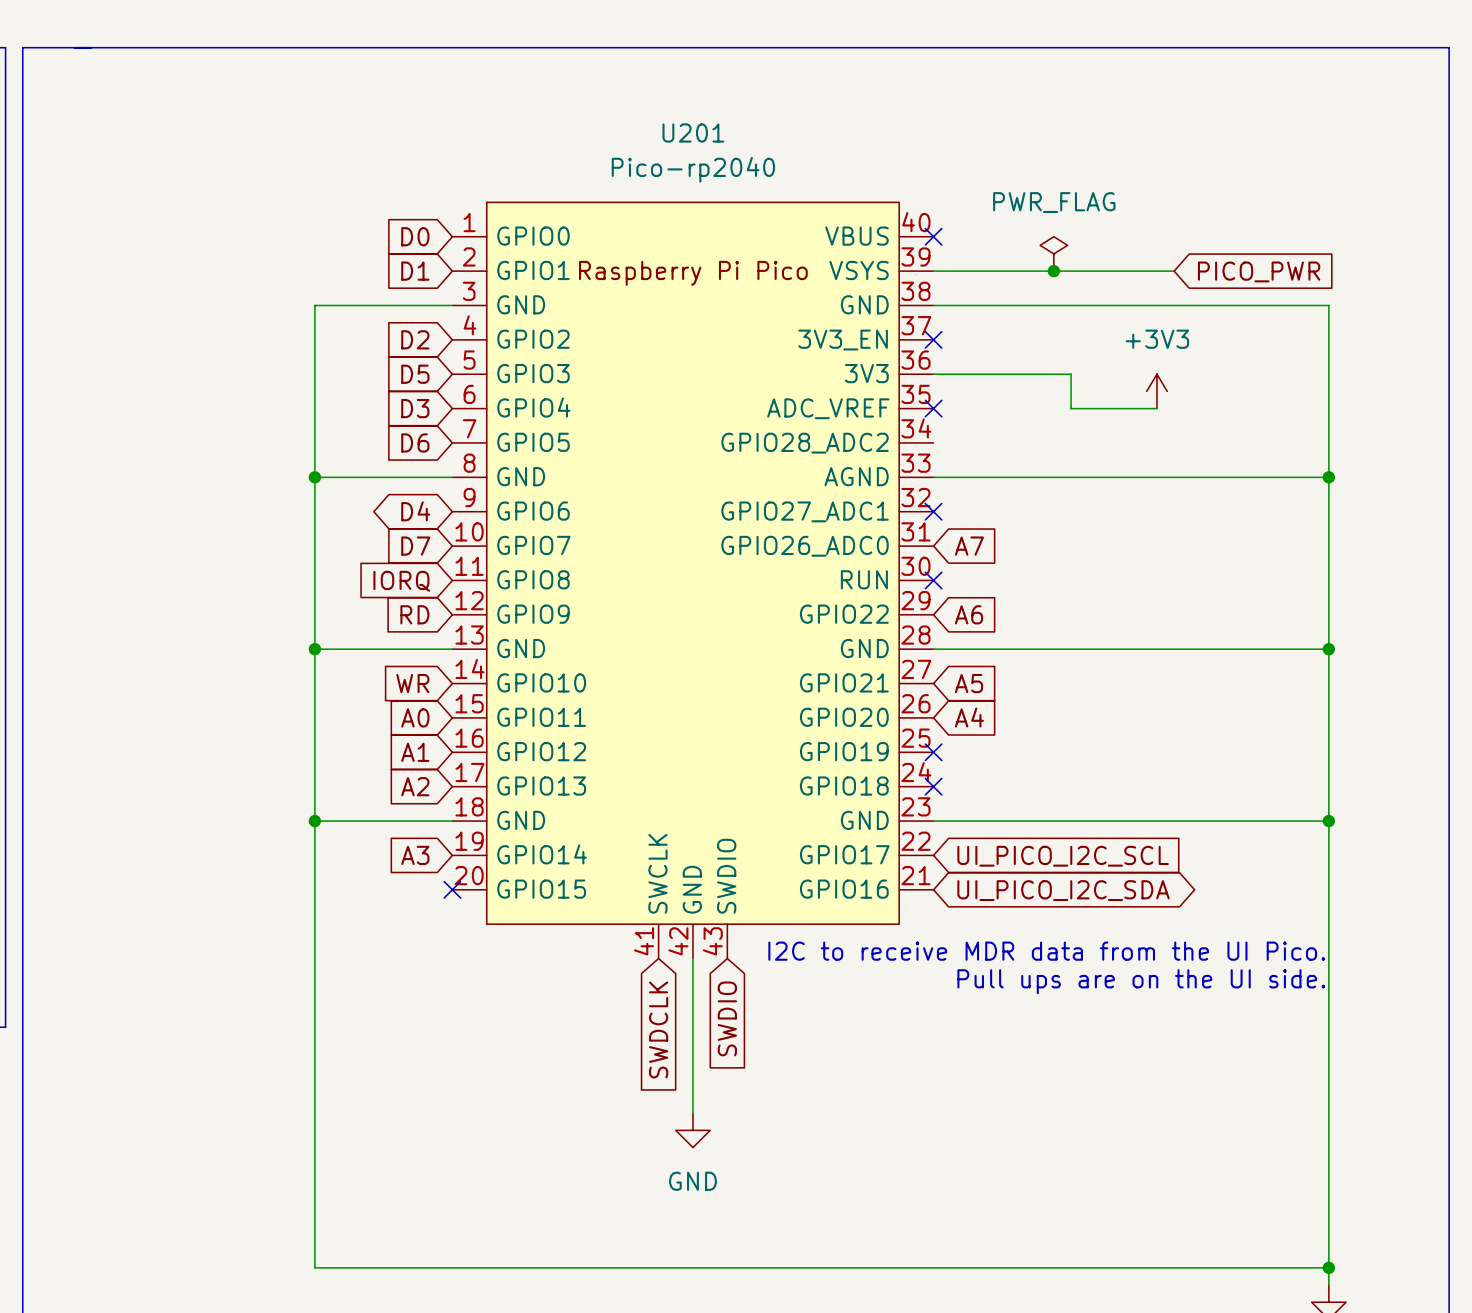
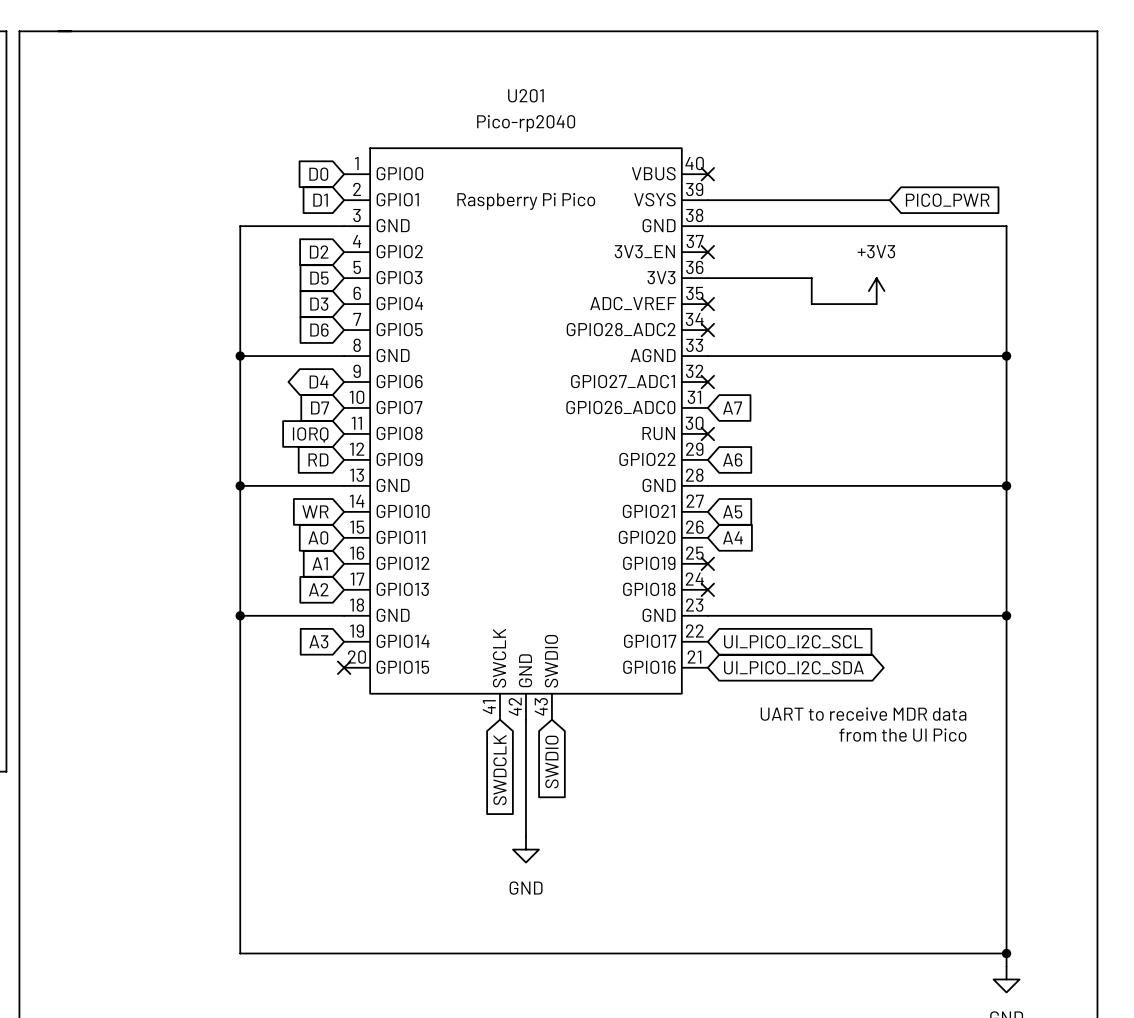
power symbol: PWR_FLAG (1053, 253) -> none
junction: (1053, 271) -> none
no-connect mark: none -> (707, 330)
text: I2C to receive MDR data from the UI Pico. (1046, 951) -> UART to receive MDR data (863, 714)
text: none -> from the UI Pico (902, 735)
text: Pull ups are on the UI side. (1141, 981) -> none

